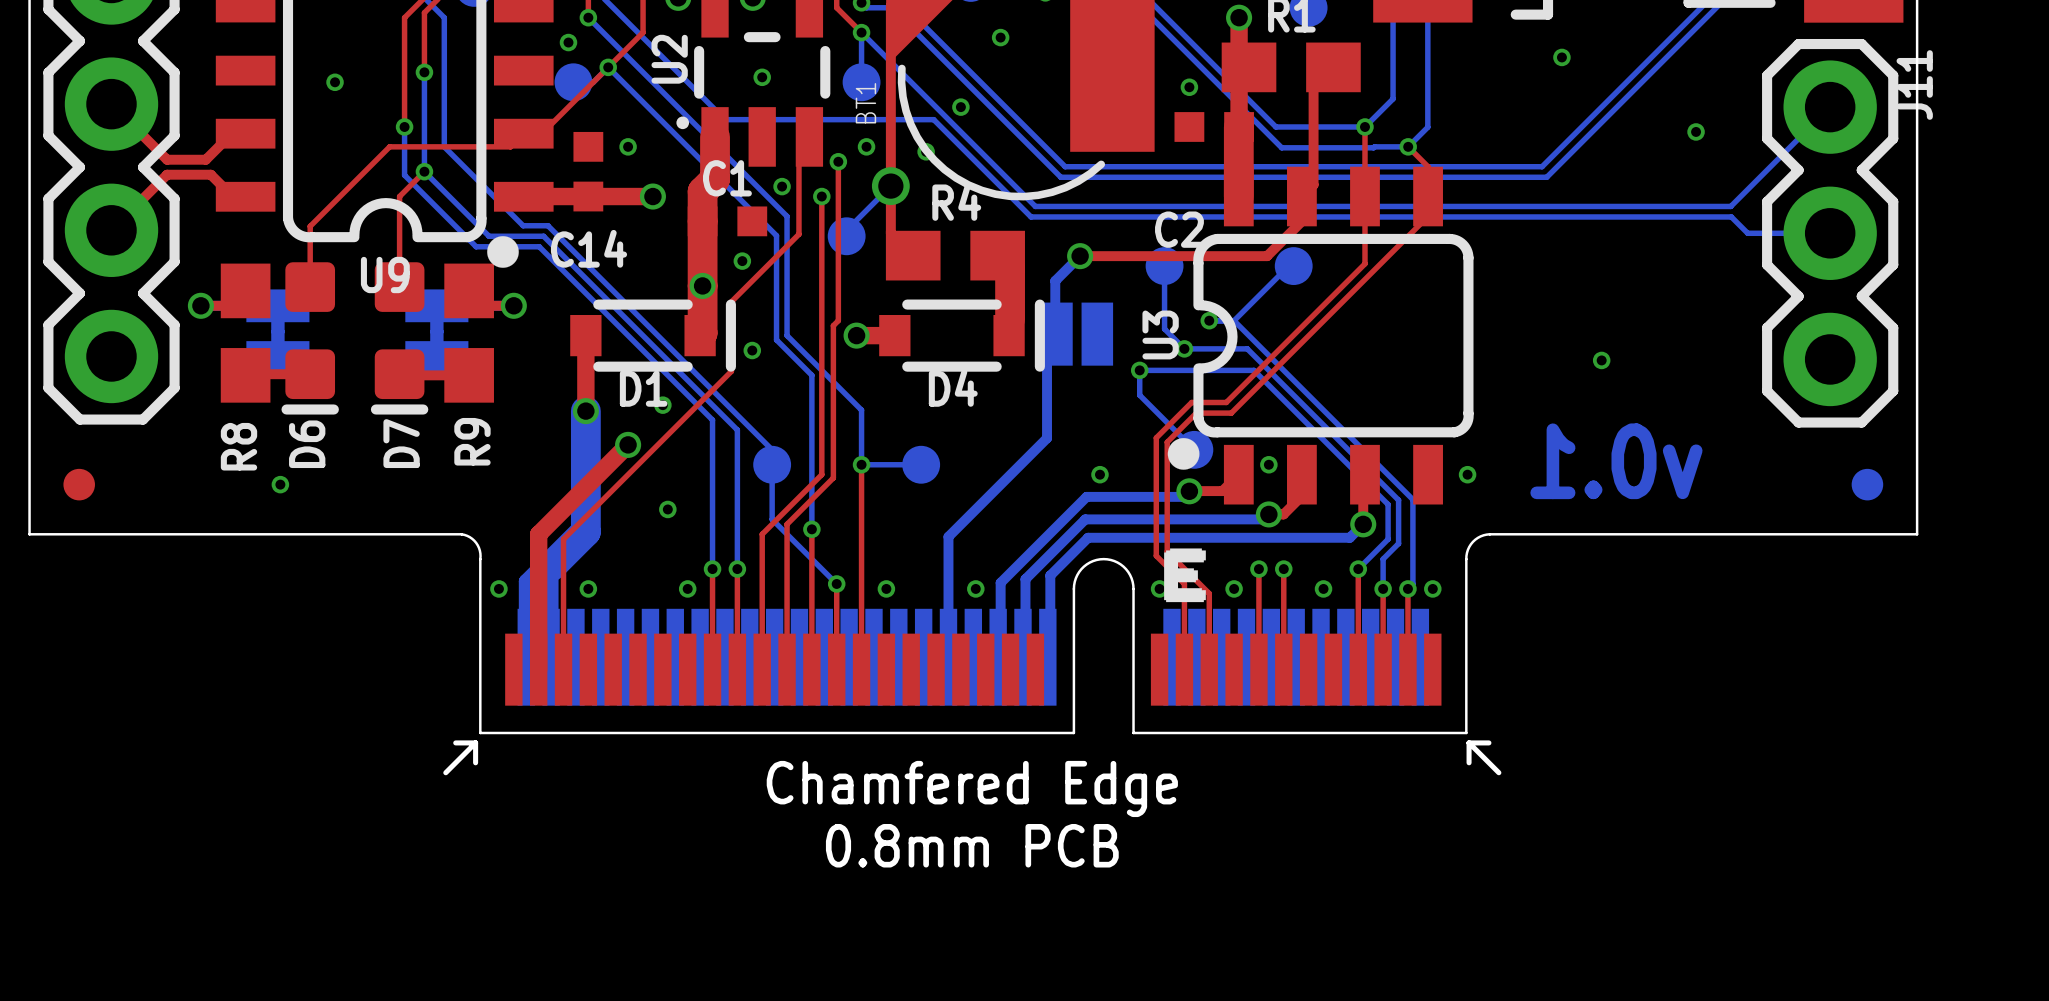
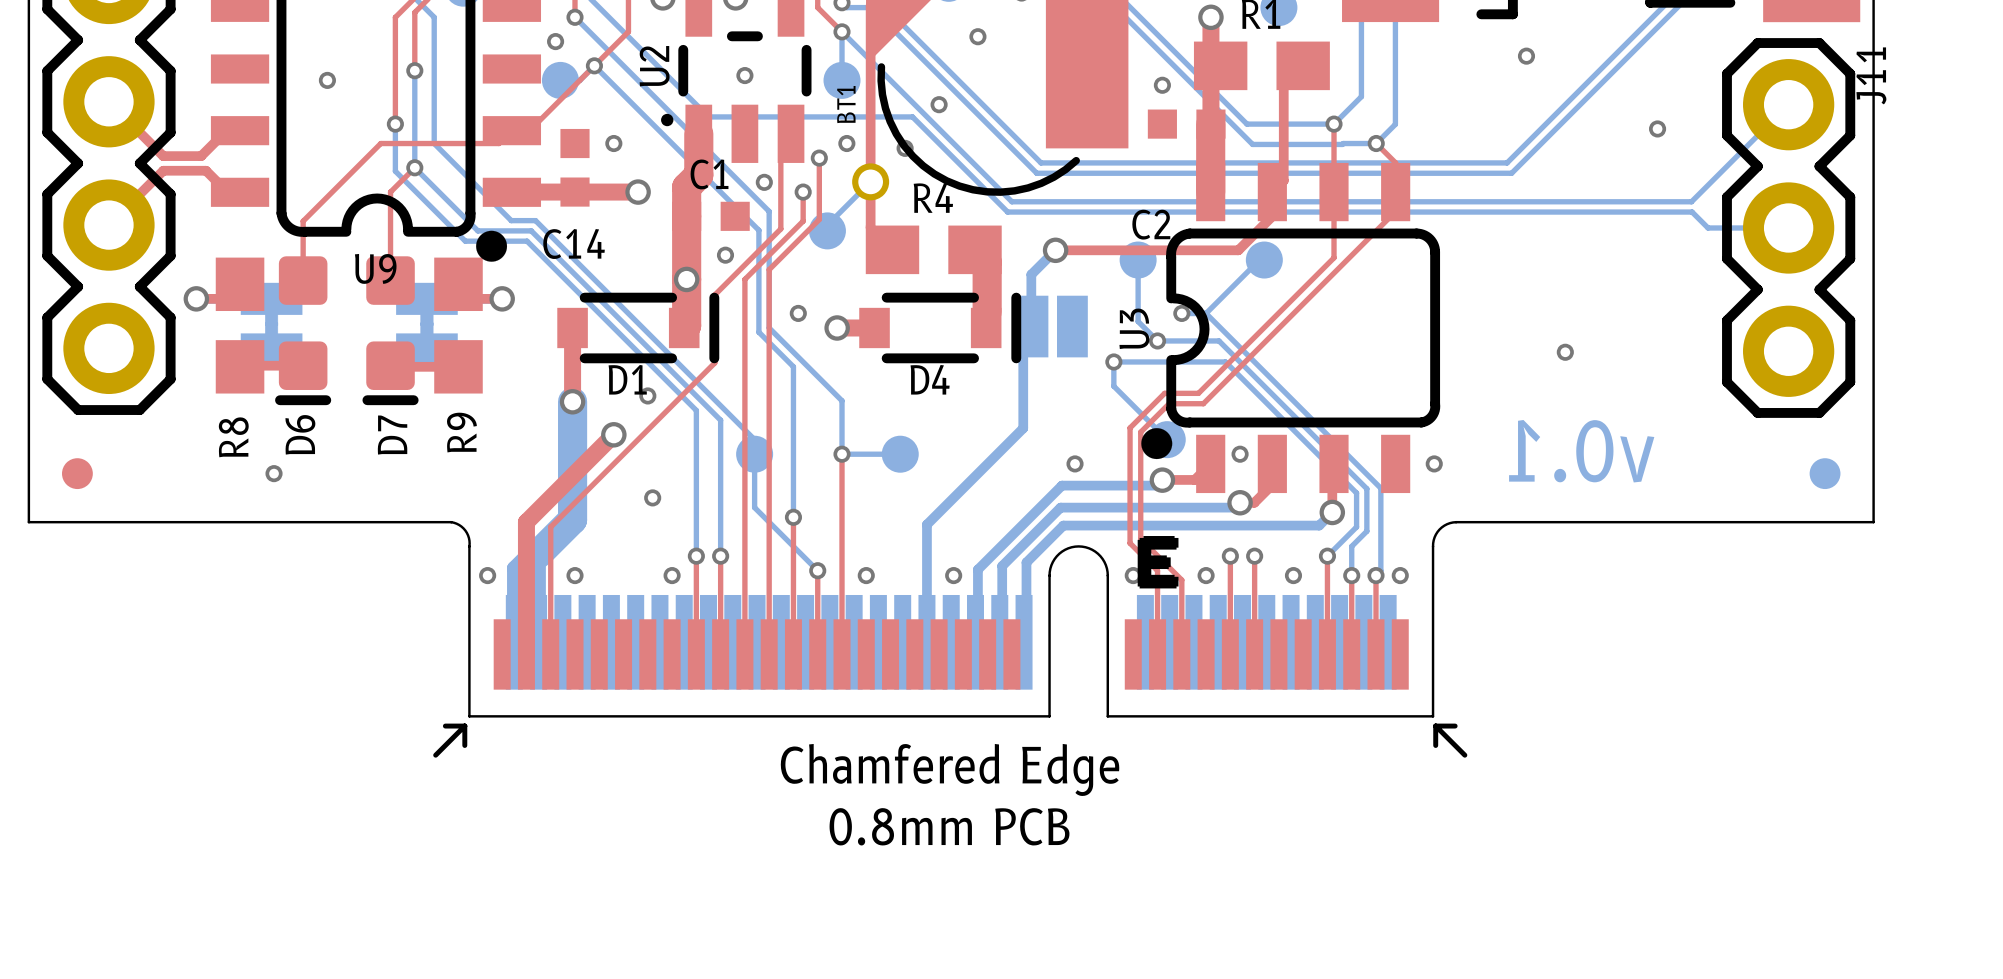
top track: (838, 224) (838, 320) (833, 325) (833, 477) (787, 524) -> (819, 219) (769, 269) (769, 512)
top track: (821, 226) (821, 474) (762, 534) -> (803, 221) (744, 279) (744, 522)
via position: (752, 350) -> (798, 313)

